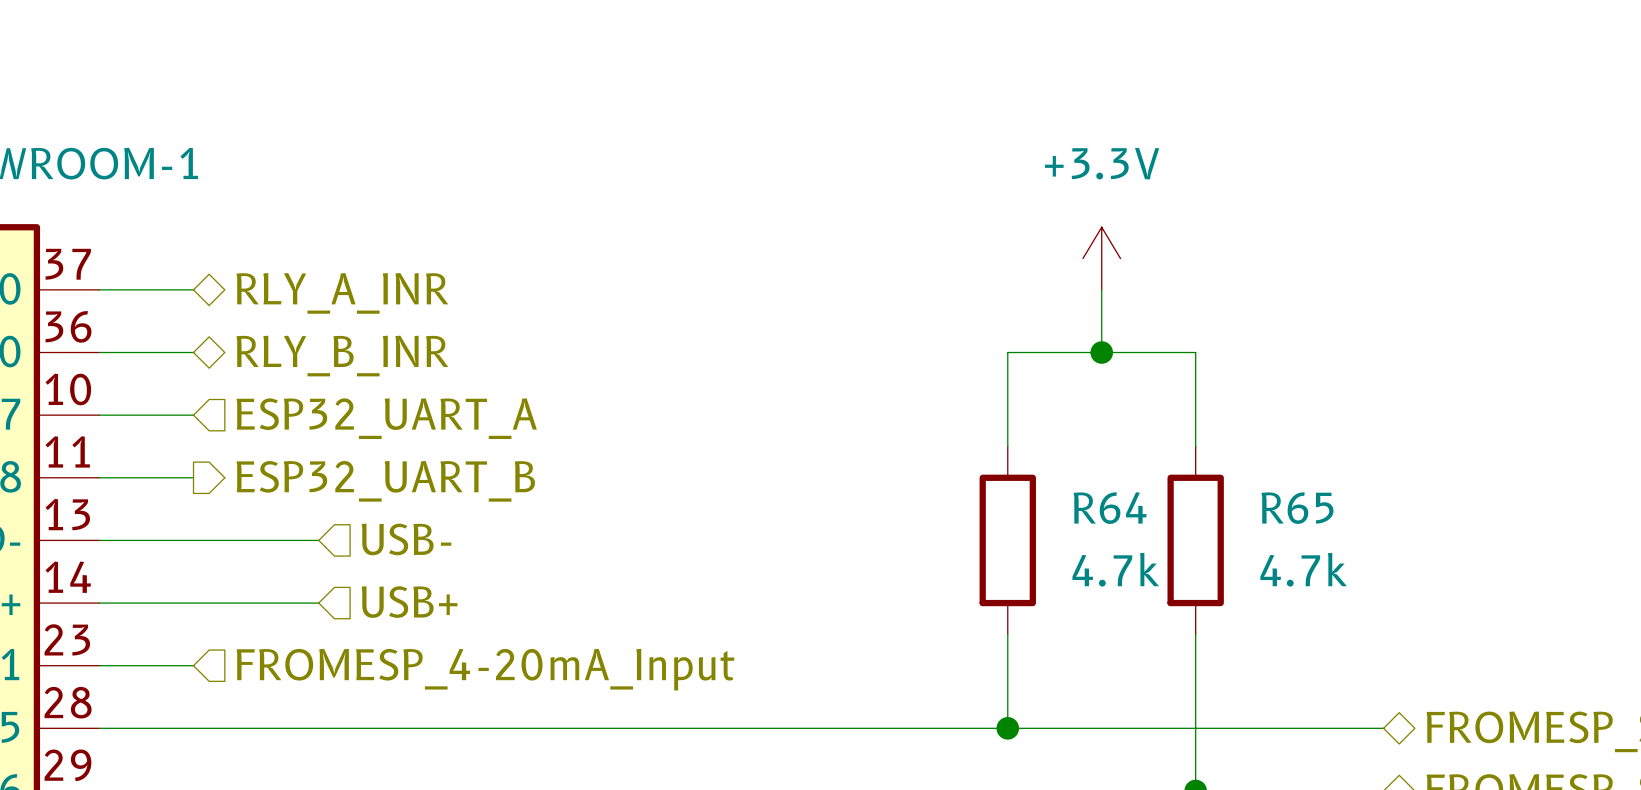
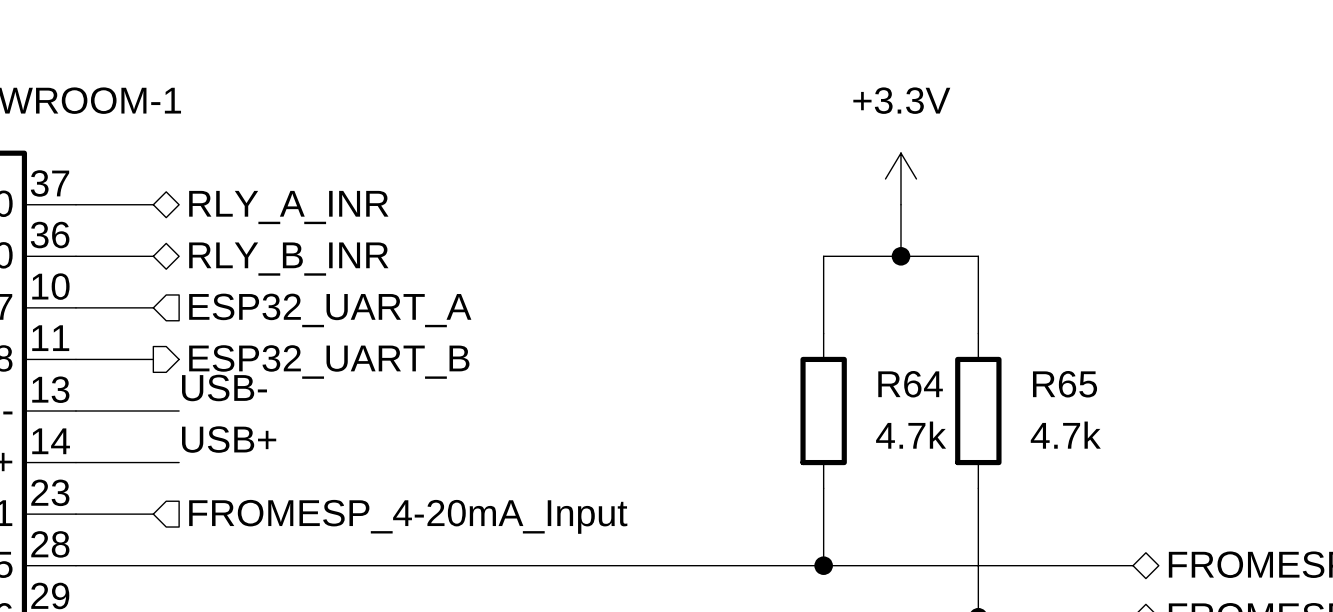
label: none -> USB- (224, 387)
hierarchical label: USB- (406, 539) -> none
wire: (224, 540) (318, 540) -> none
label: none -> USB+ (229, 439)
hierarchical label: USB+ (409, 602) -> none
wire: (224, 603) (318, 603) -> none

